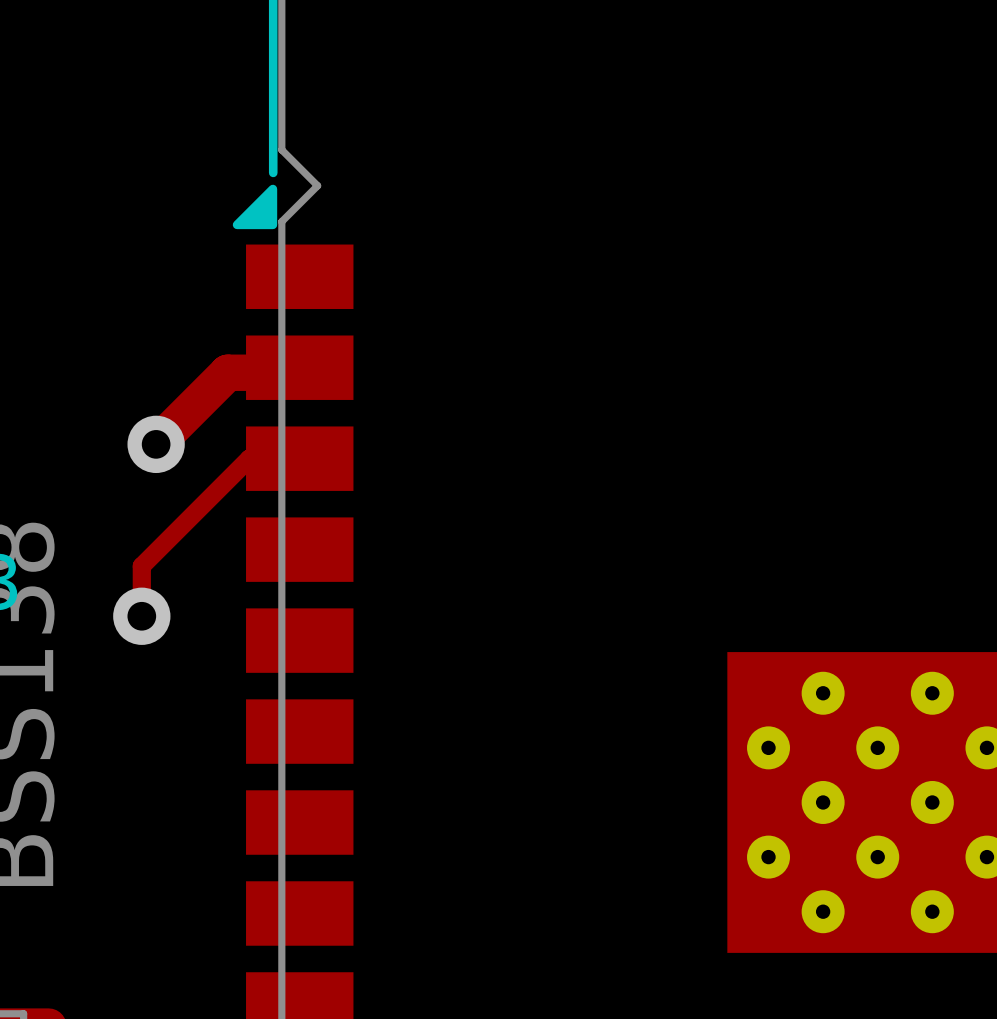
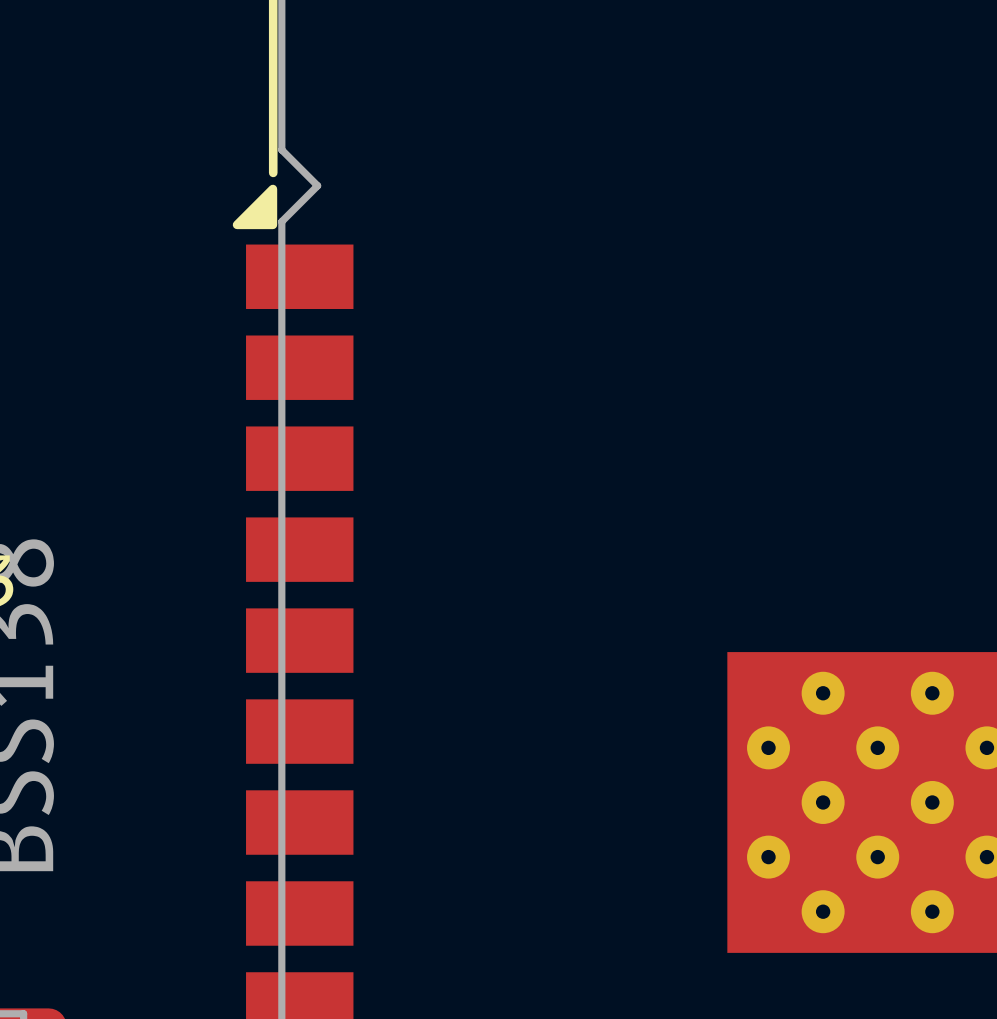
track: (299, 367) (294, 372) (227, 372) (156, 444) -> none
via: (156, 444) -> none
track: (299, 458) (249, 458) (141, 566) (141, 616) -> none
via: (141, 616) -> none

